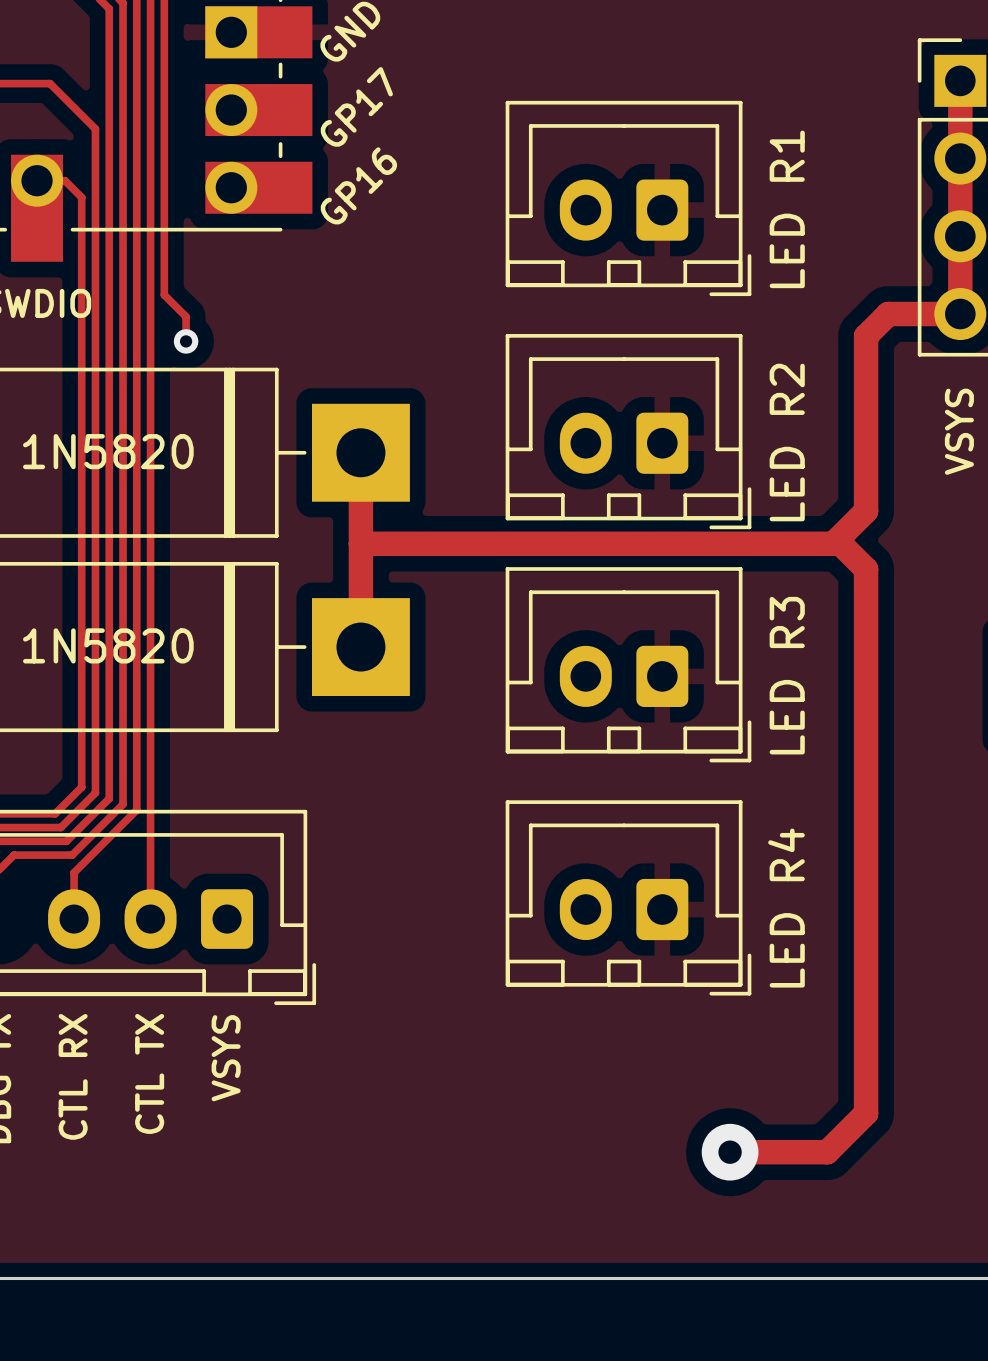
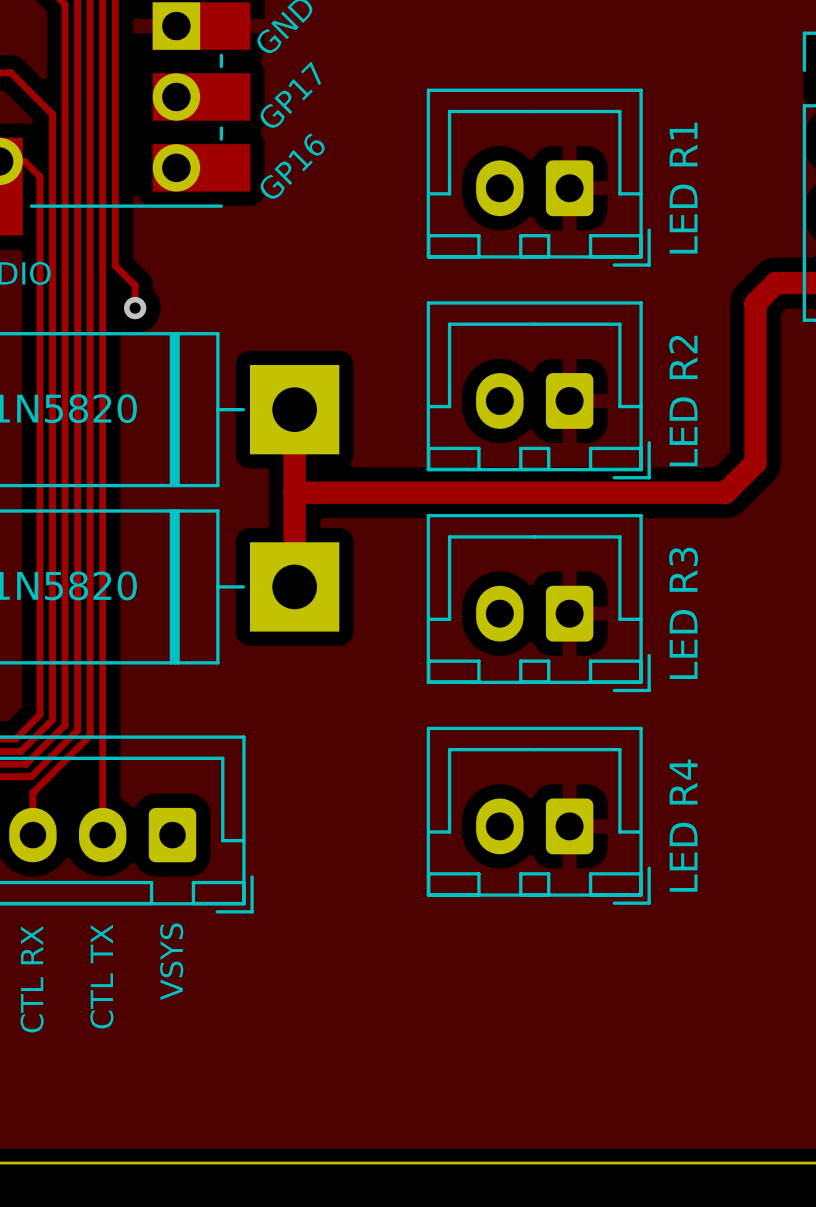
track: (833, 543) (840, 543) (866, 569) (866, 1113) (827, 1152) (730, 1152) -> none
via: (730, 1152) -> none

